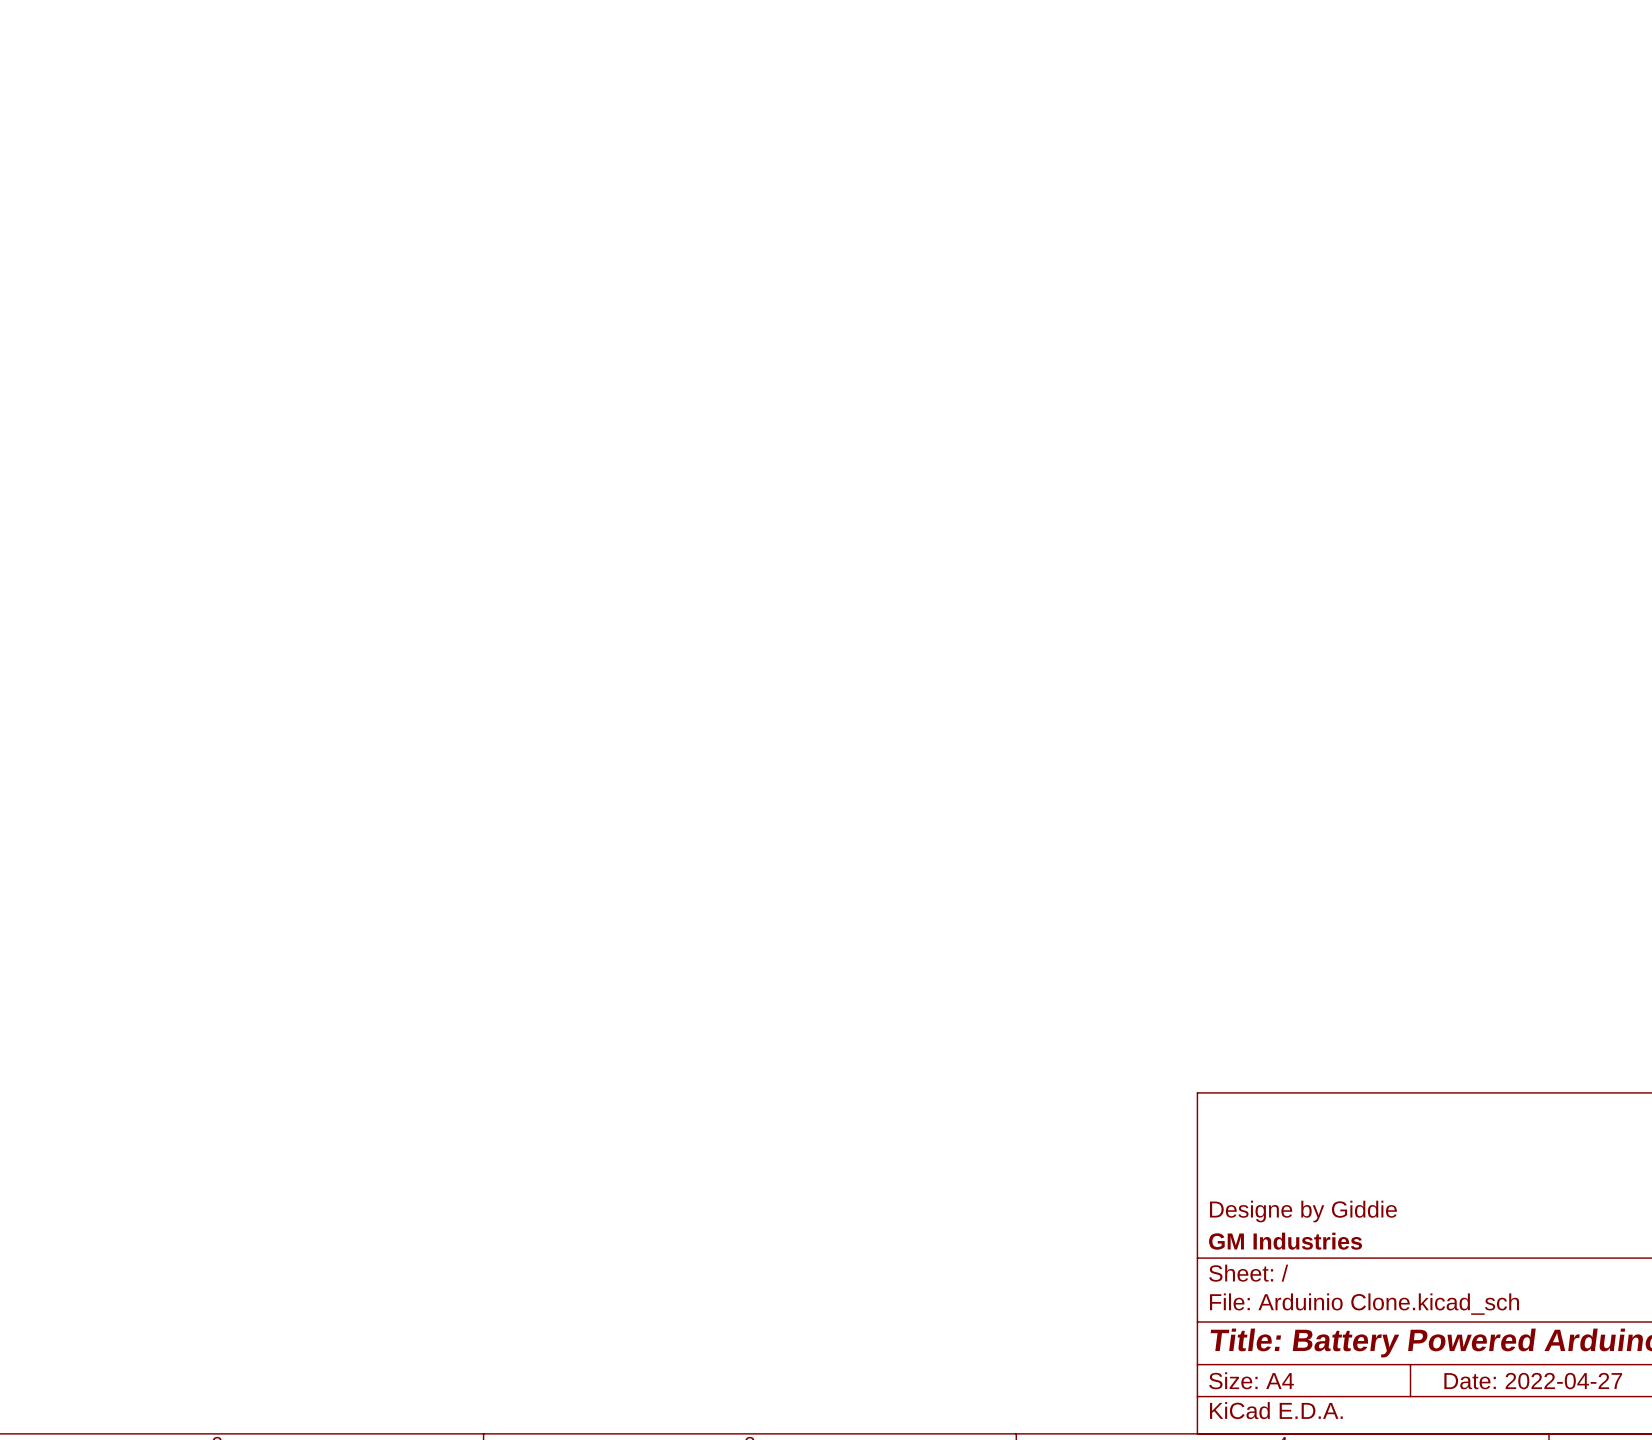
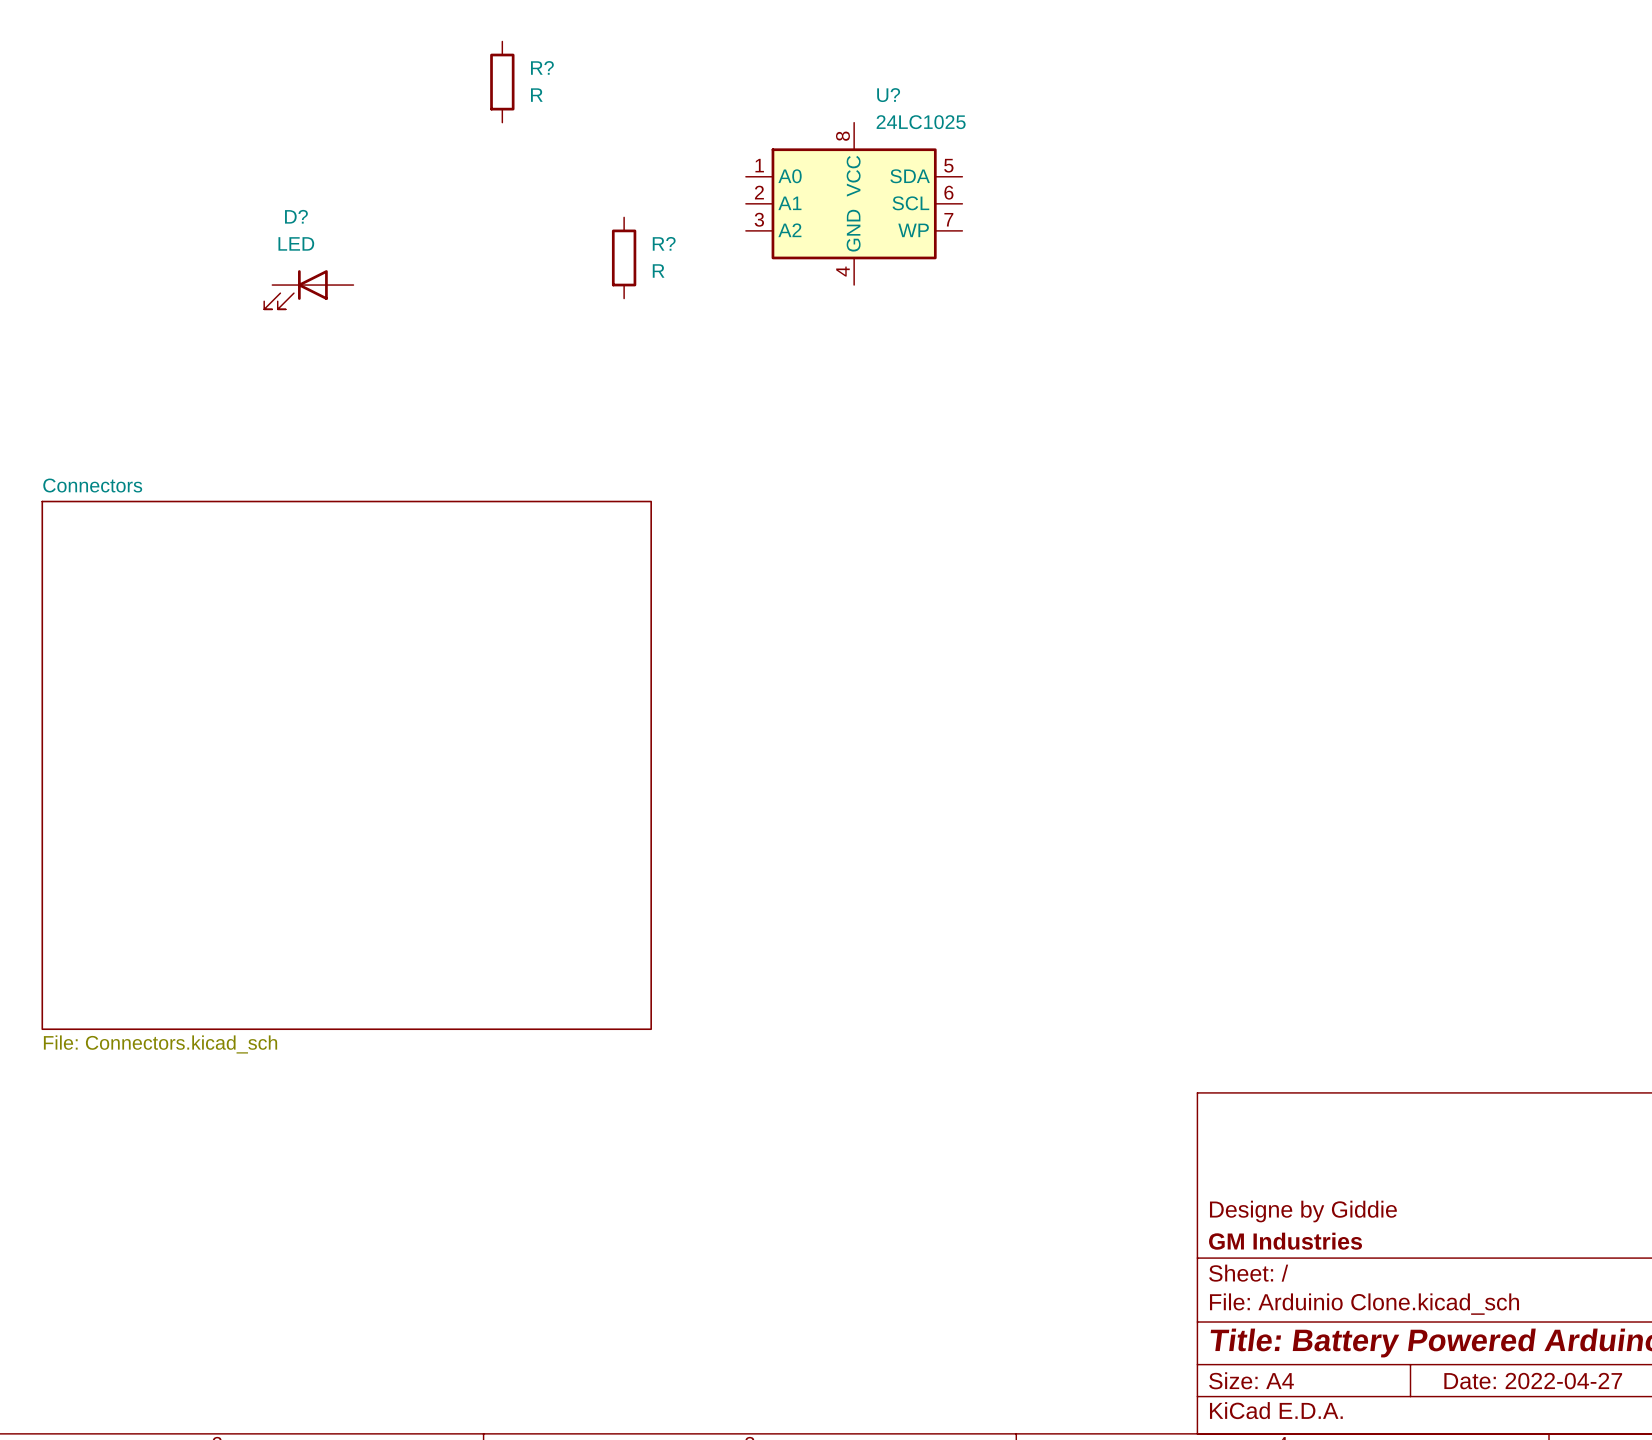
R?: none -> R (502, 82)
U?: none -> 24LC1025 (854, 203)
R?: none -> R (624, 257)
D?: none -> LED (308, 289)
sheet Connectors: none -> File: Connectors.kicad_sch (346, 765)

